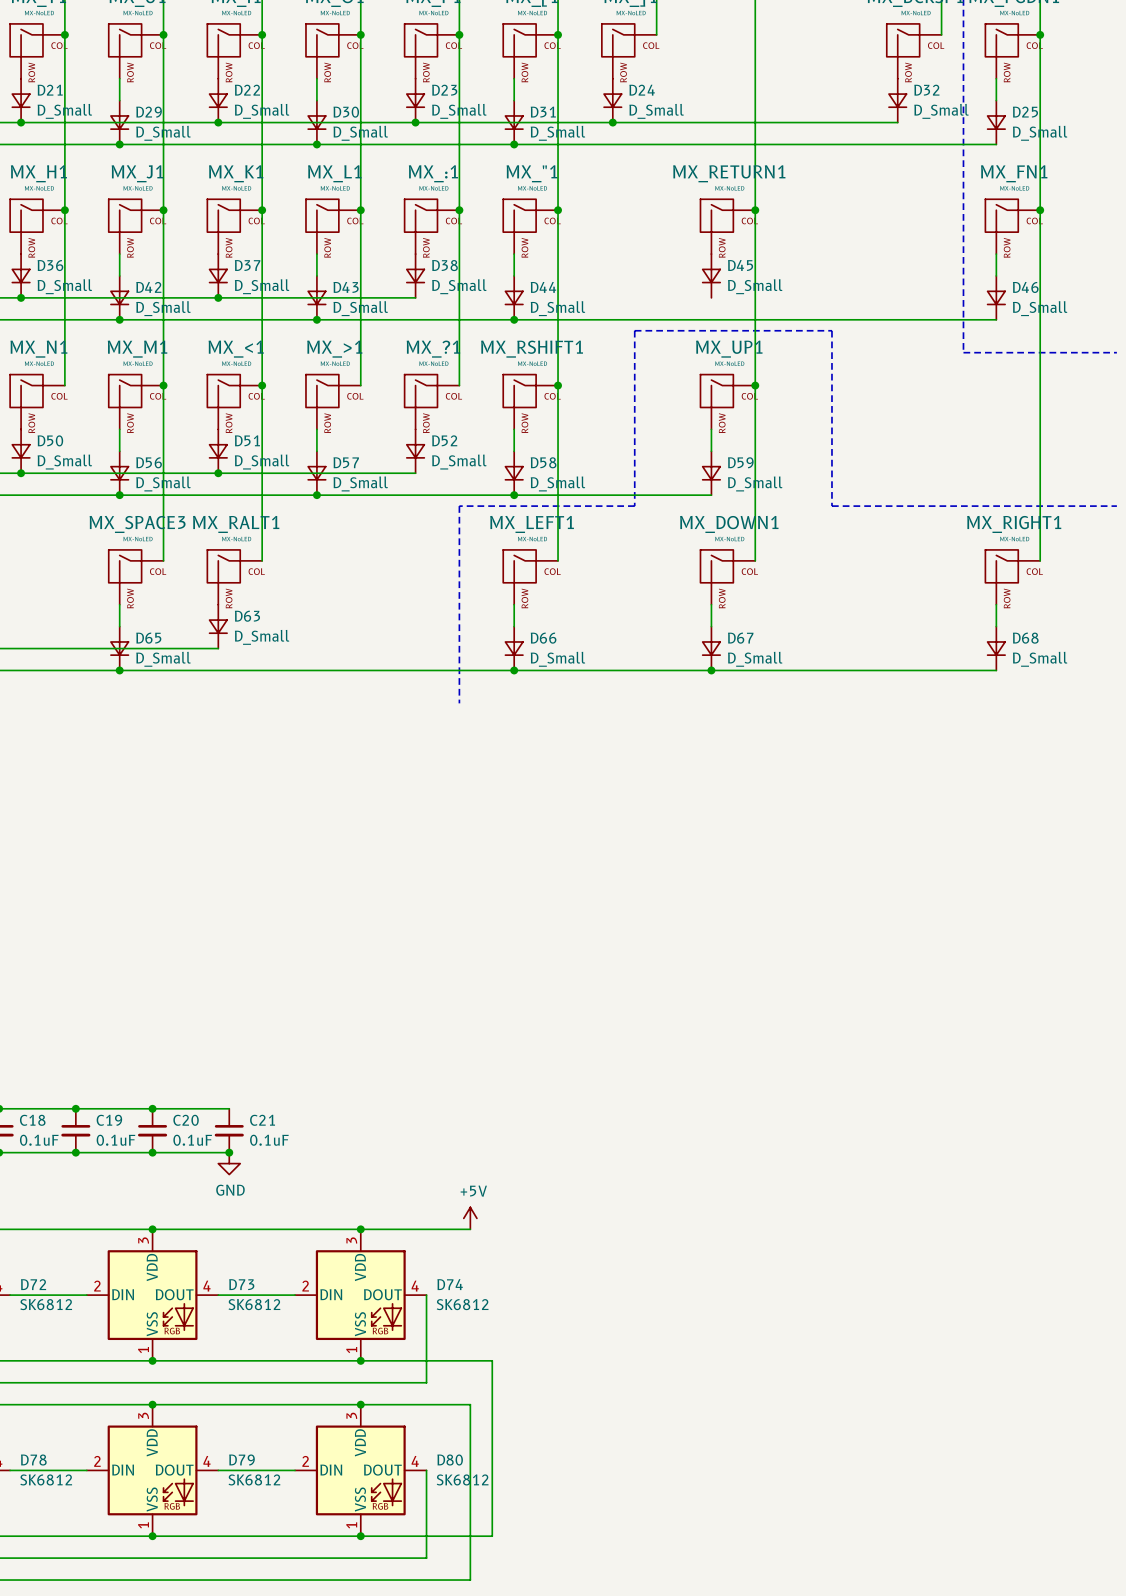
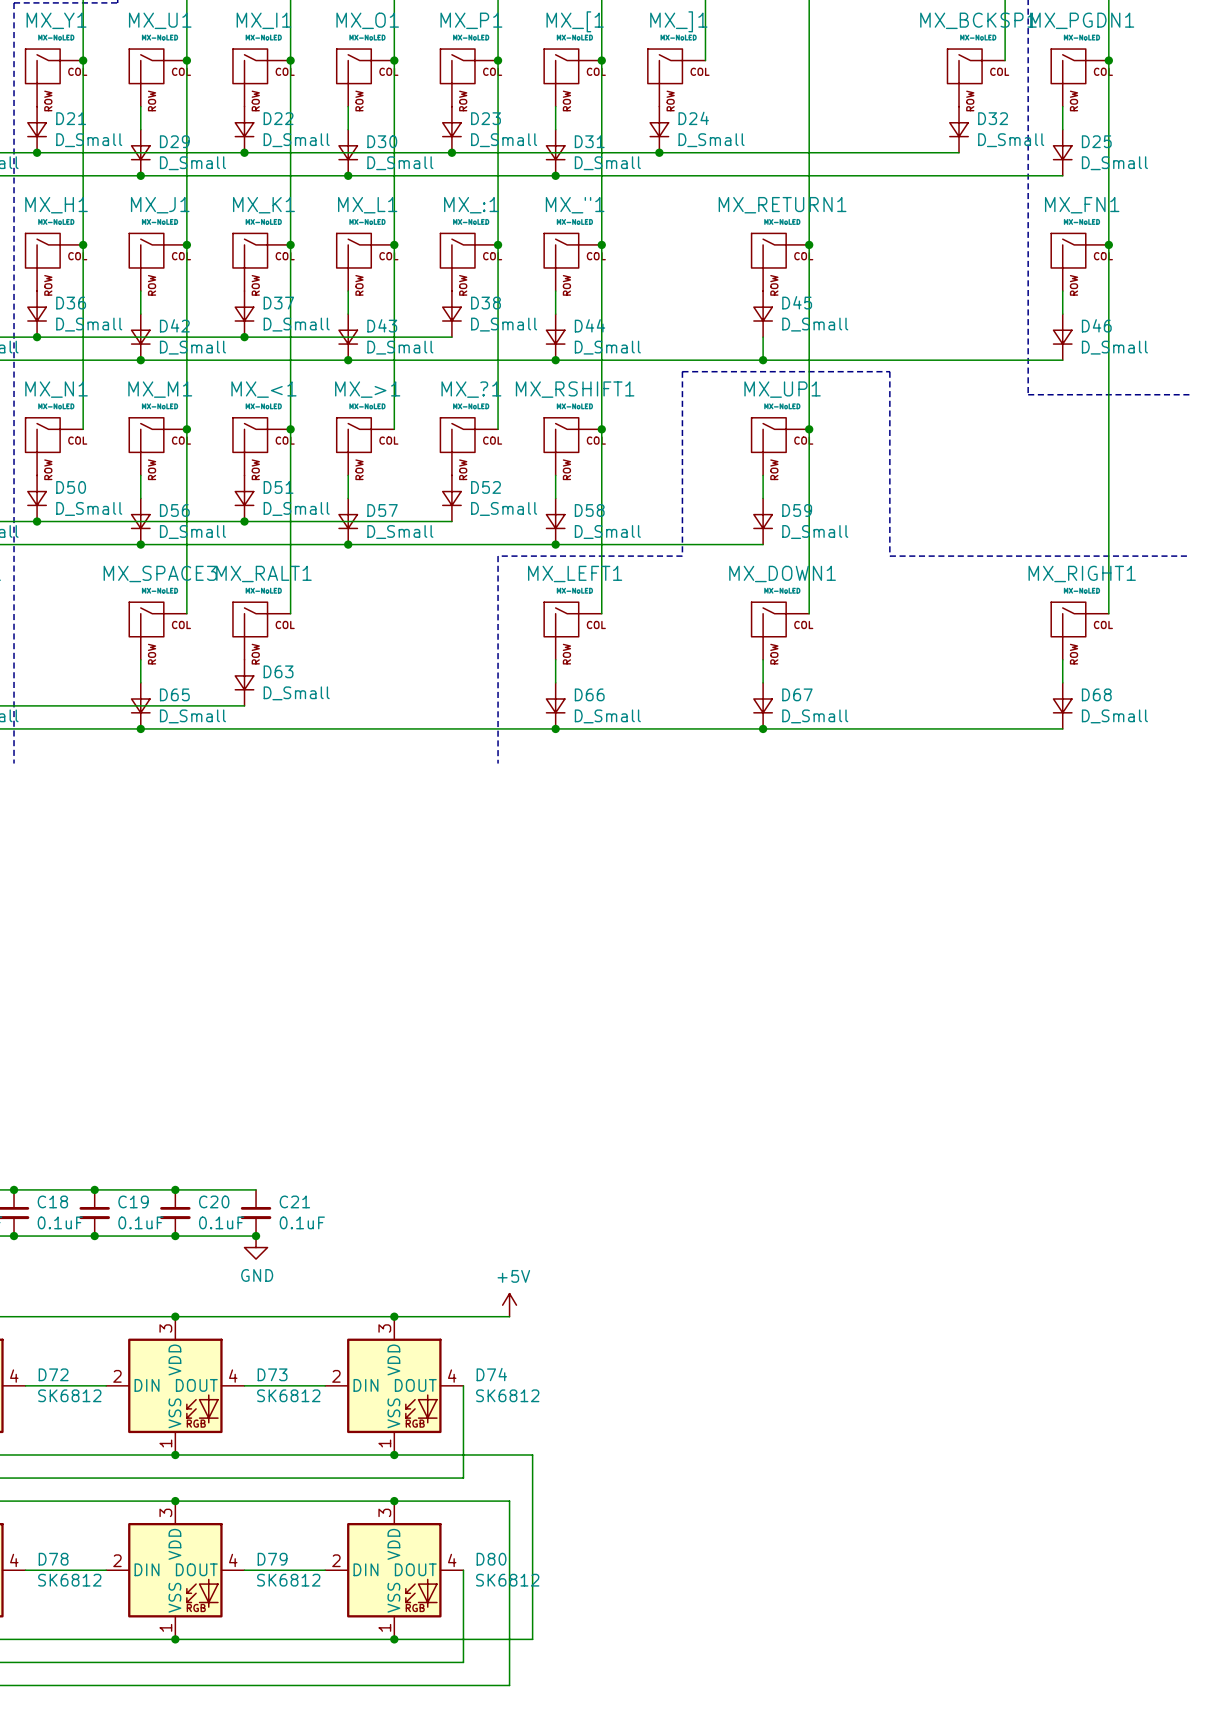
wire: none -> (763, 337) (763, 360)
junction: none -> (763, 360)

